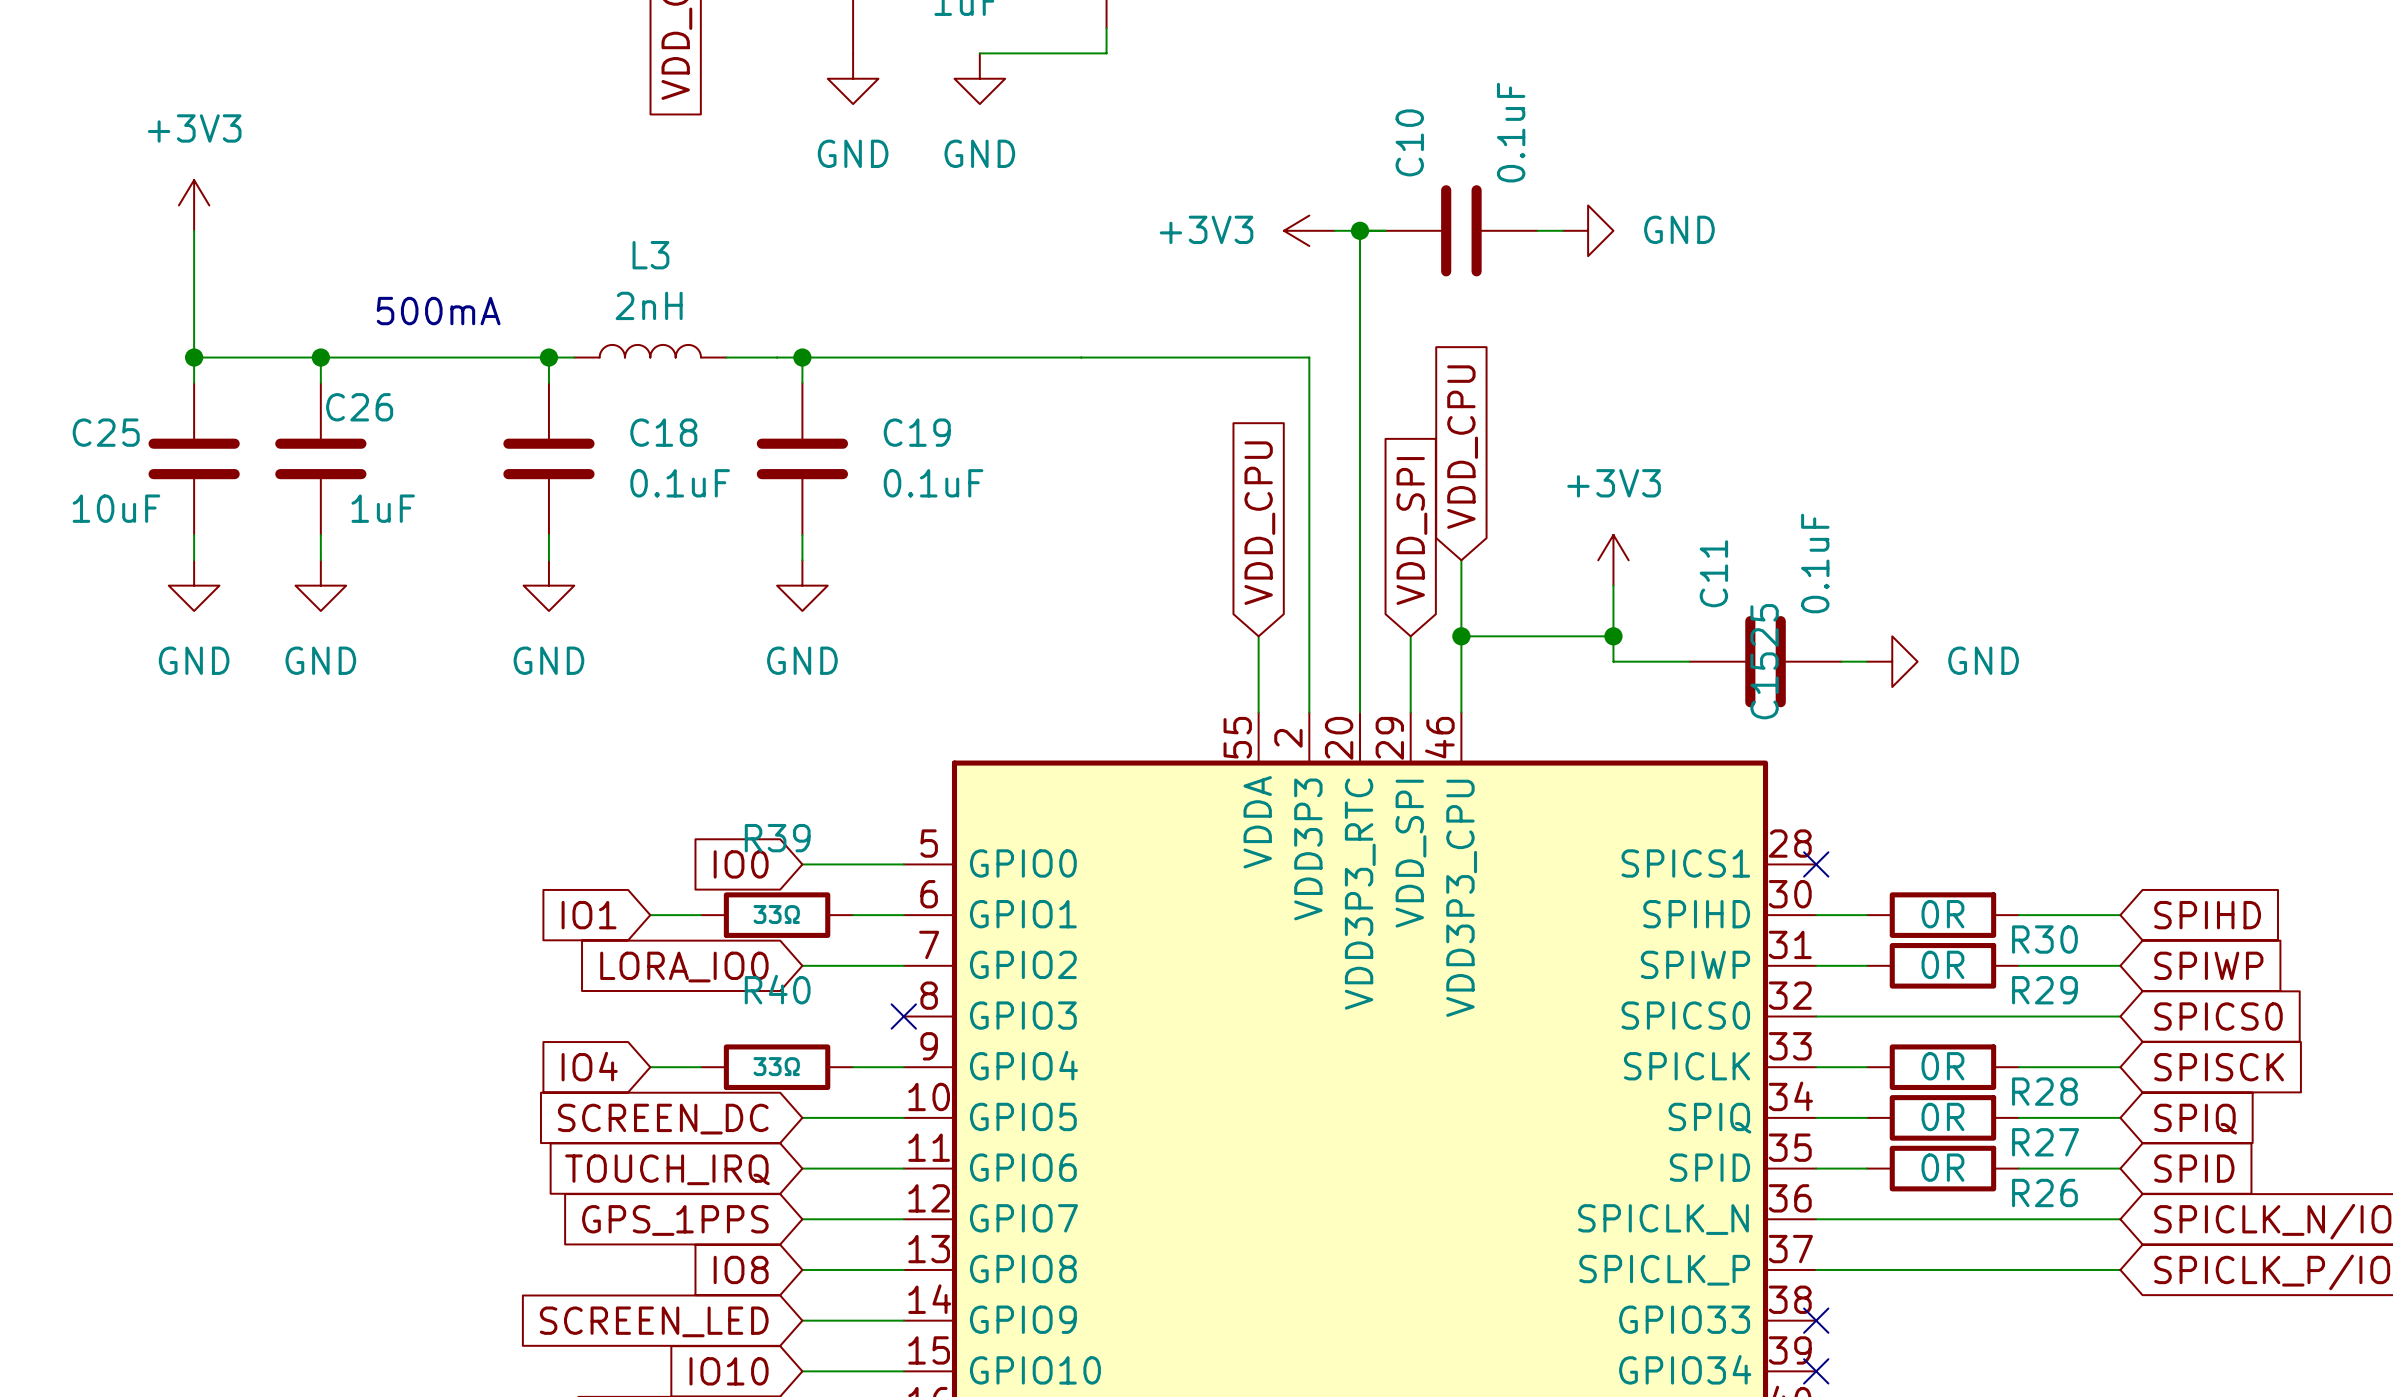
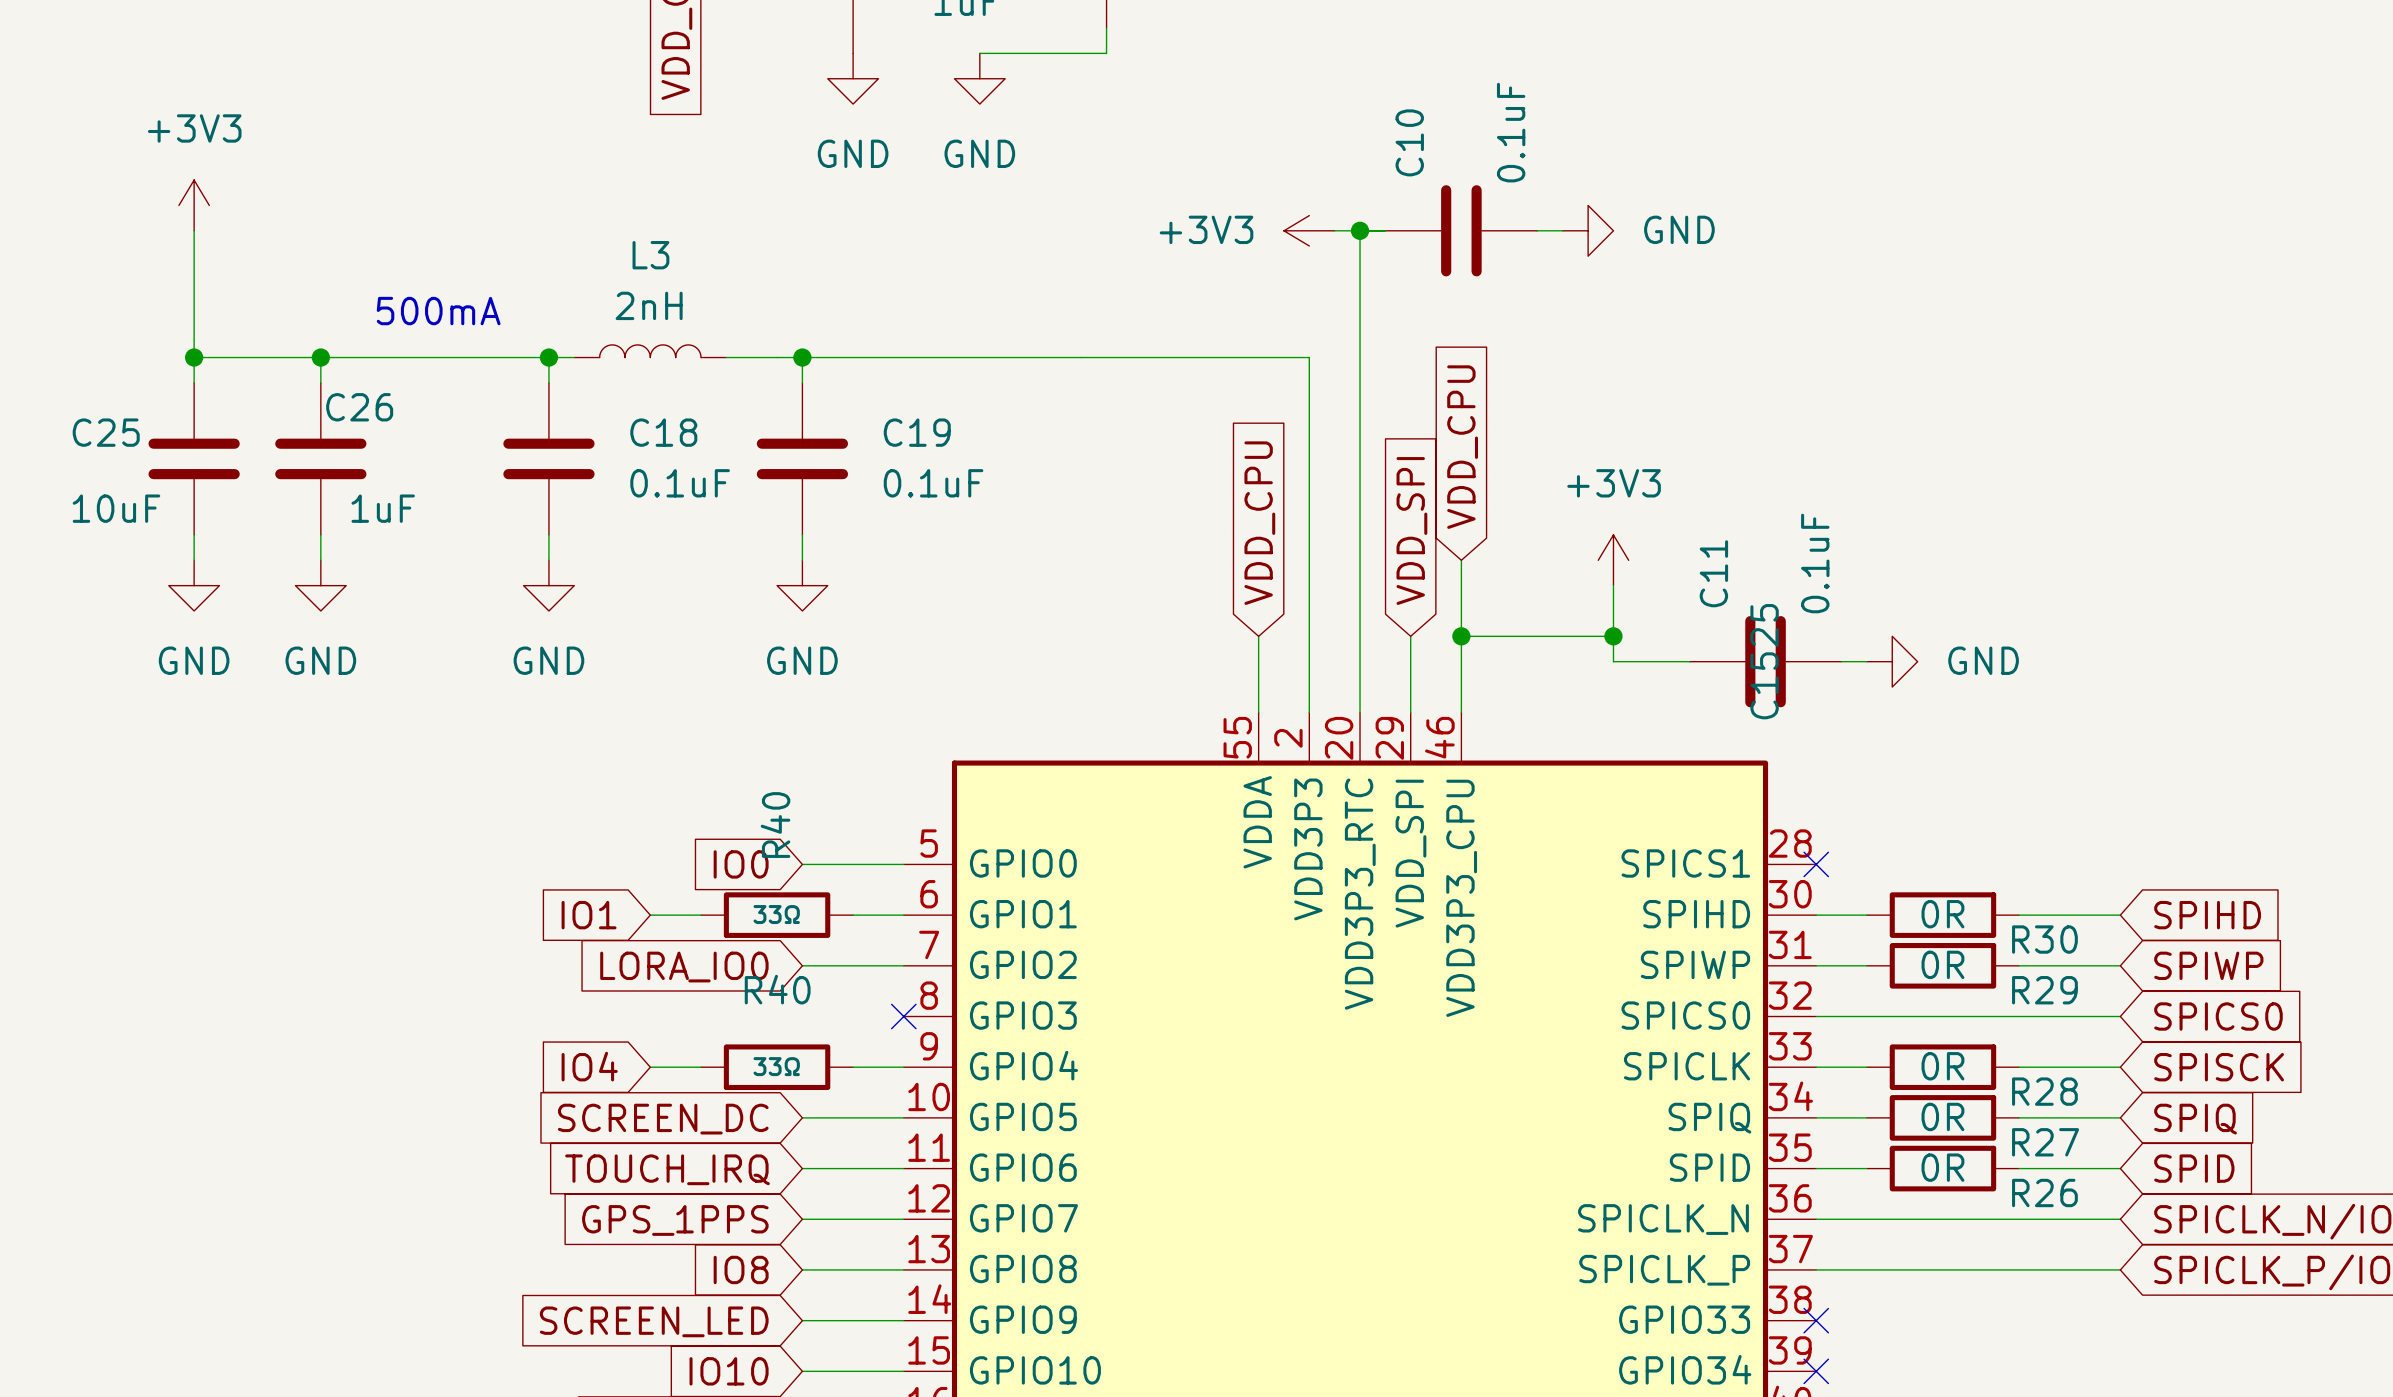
R39 name: R39 (777, 838) -> R40 (775, 825)

